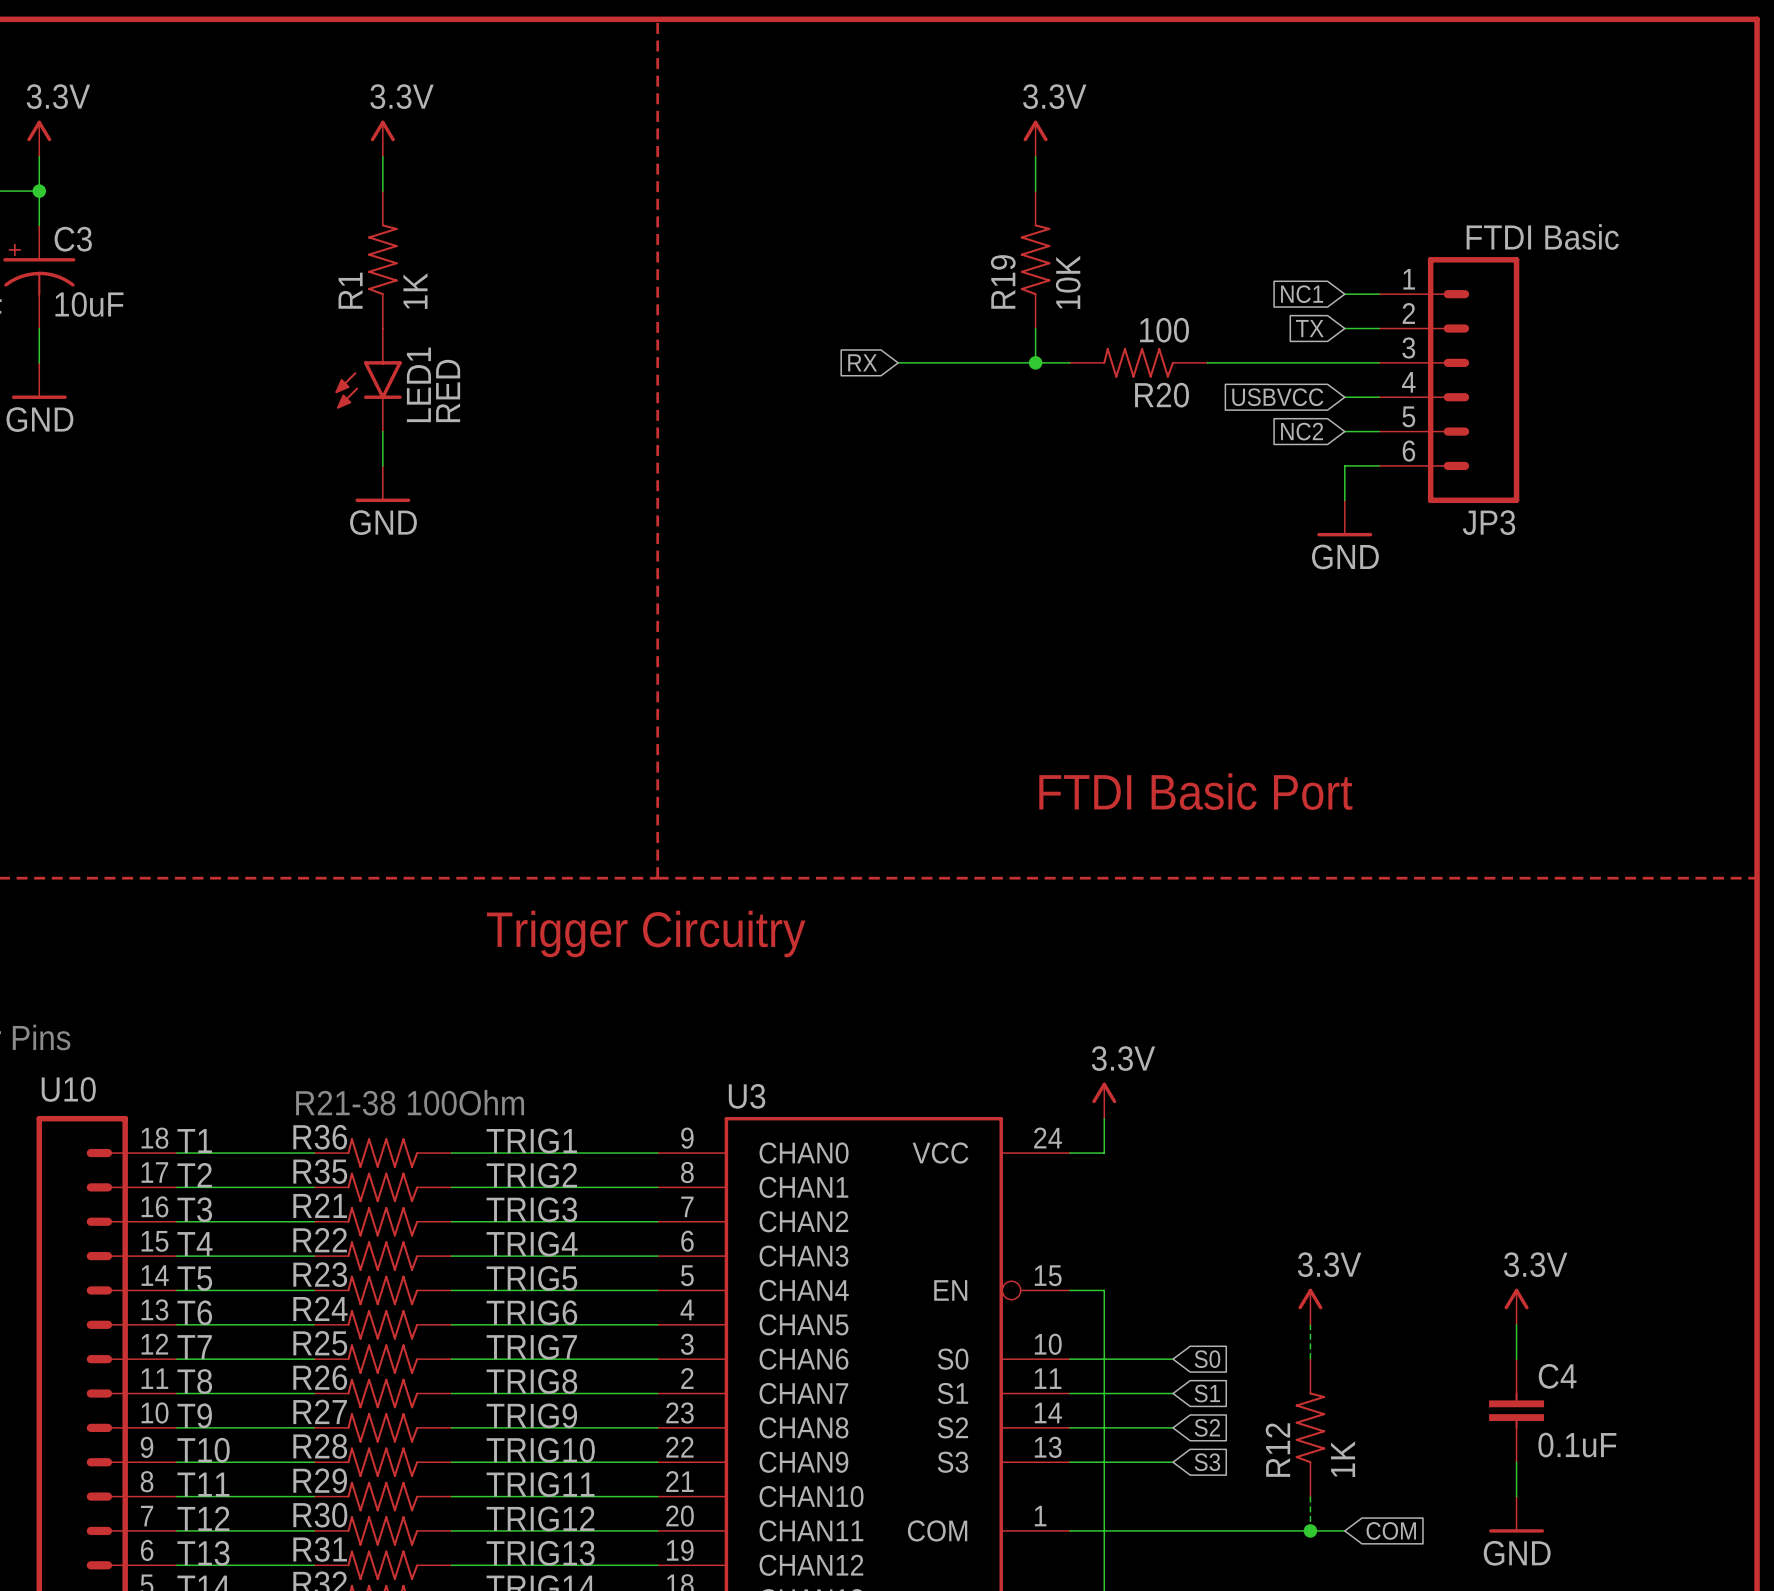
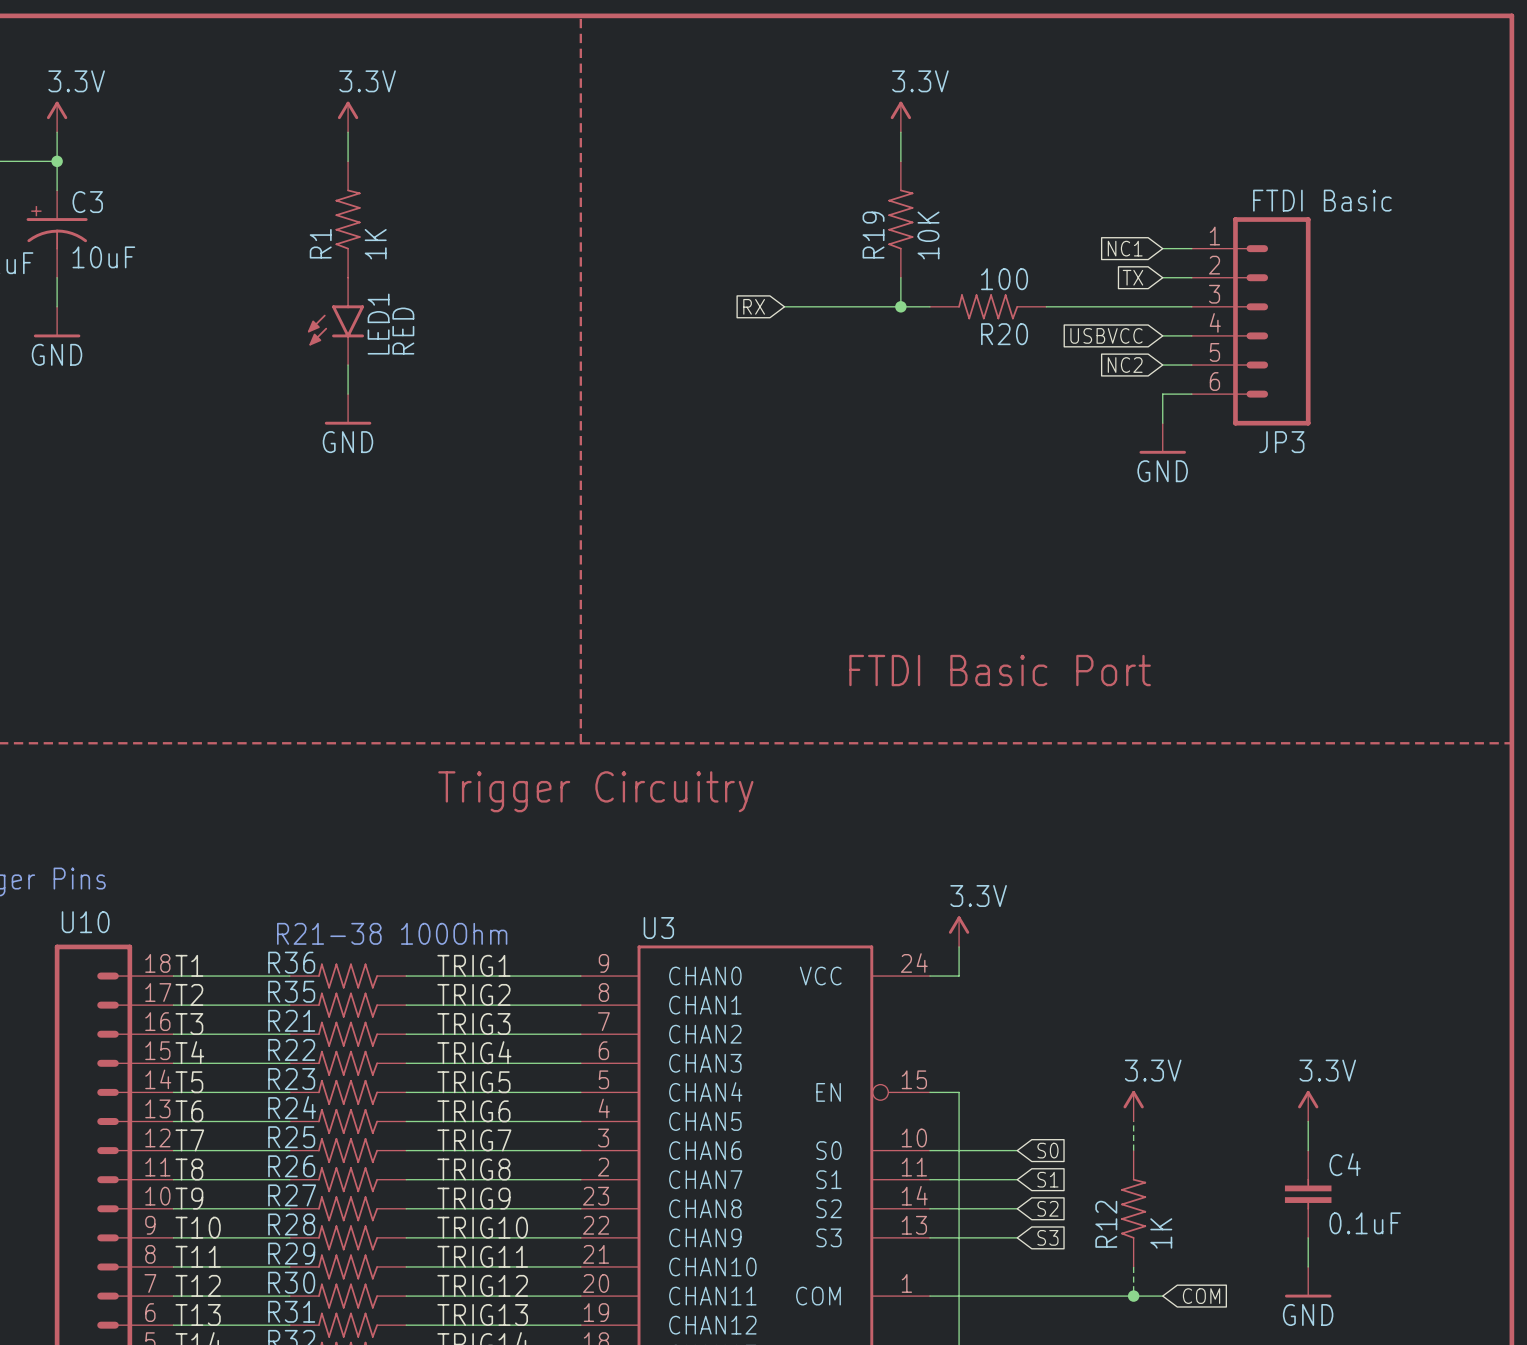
text position: FTDI Basic Port (1195, 791) -> FTDI Basic Port (1000, 670)

